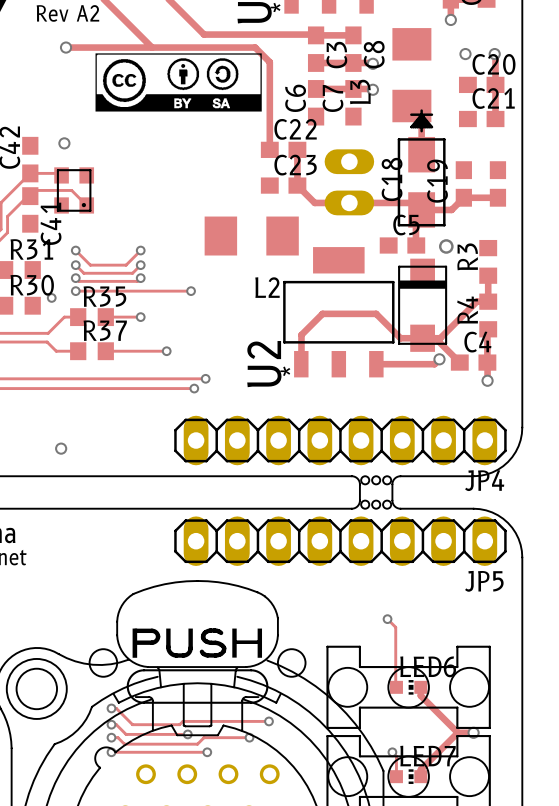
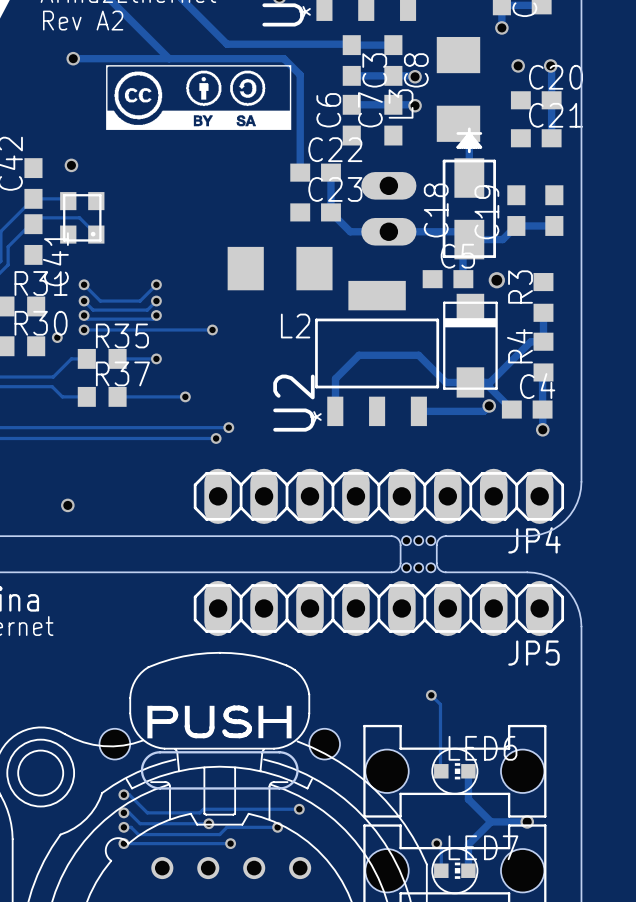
track: (420, 695) (457, 732) (420, 769) -> (468, 780) (468, 799) (491, 821)
track: none -> (491, 821) (509, 821)
track: none -> (491, 821) (468, 844) (468, 863)

